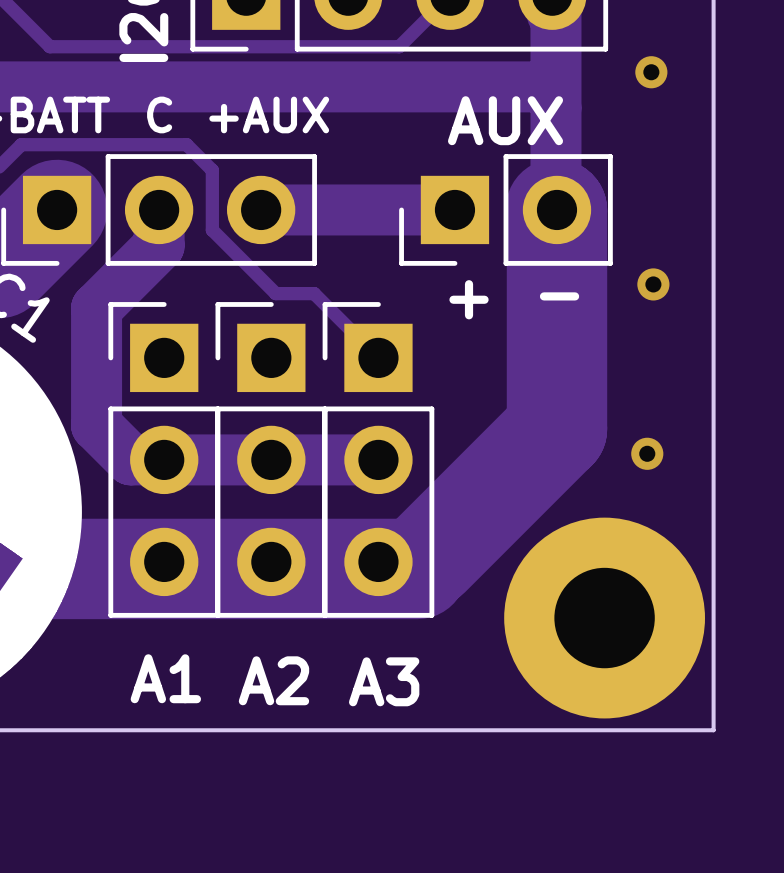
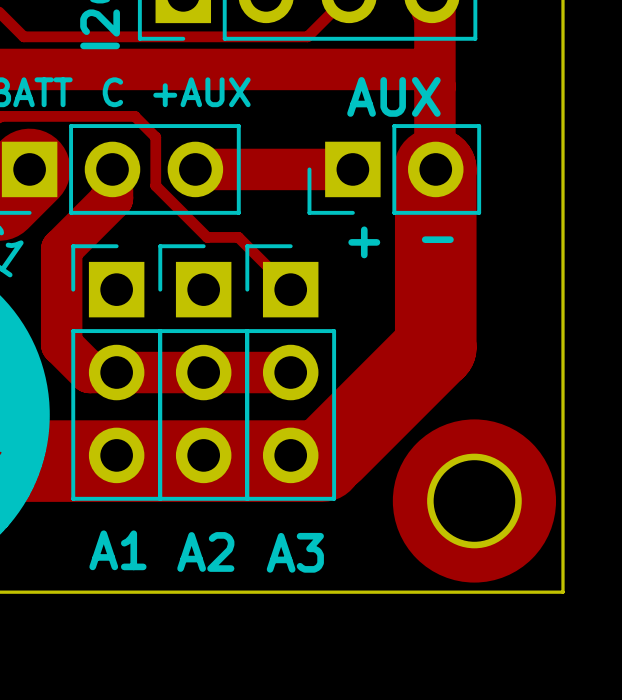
via: (651, 72) -> none
via: (653, 284) -> none
via: (647, 453) -> none

